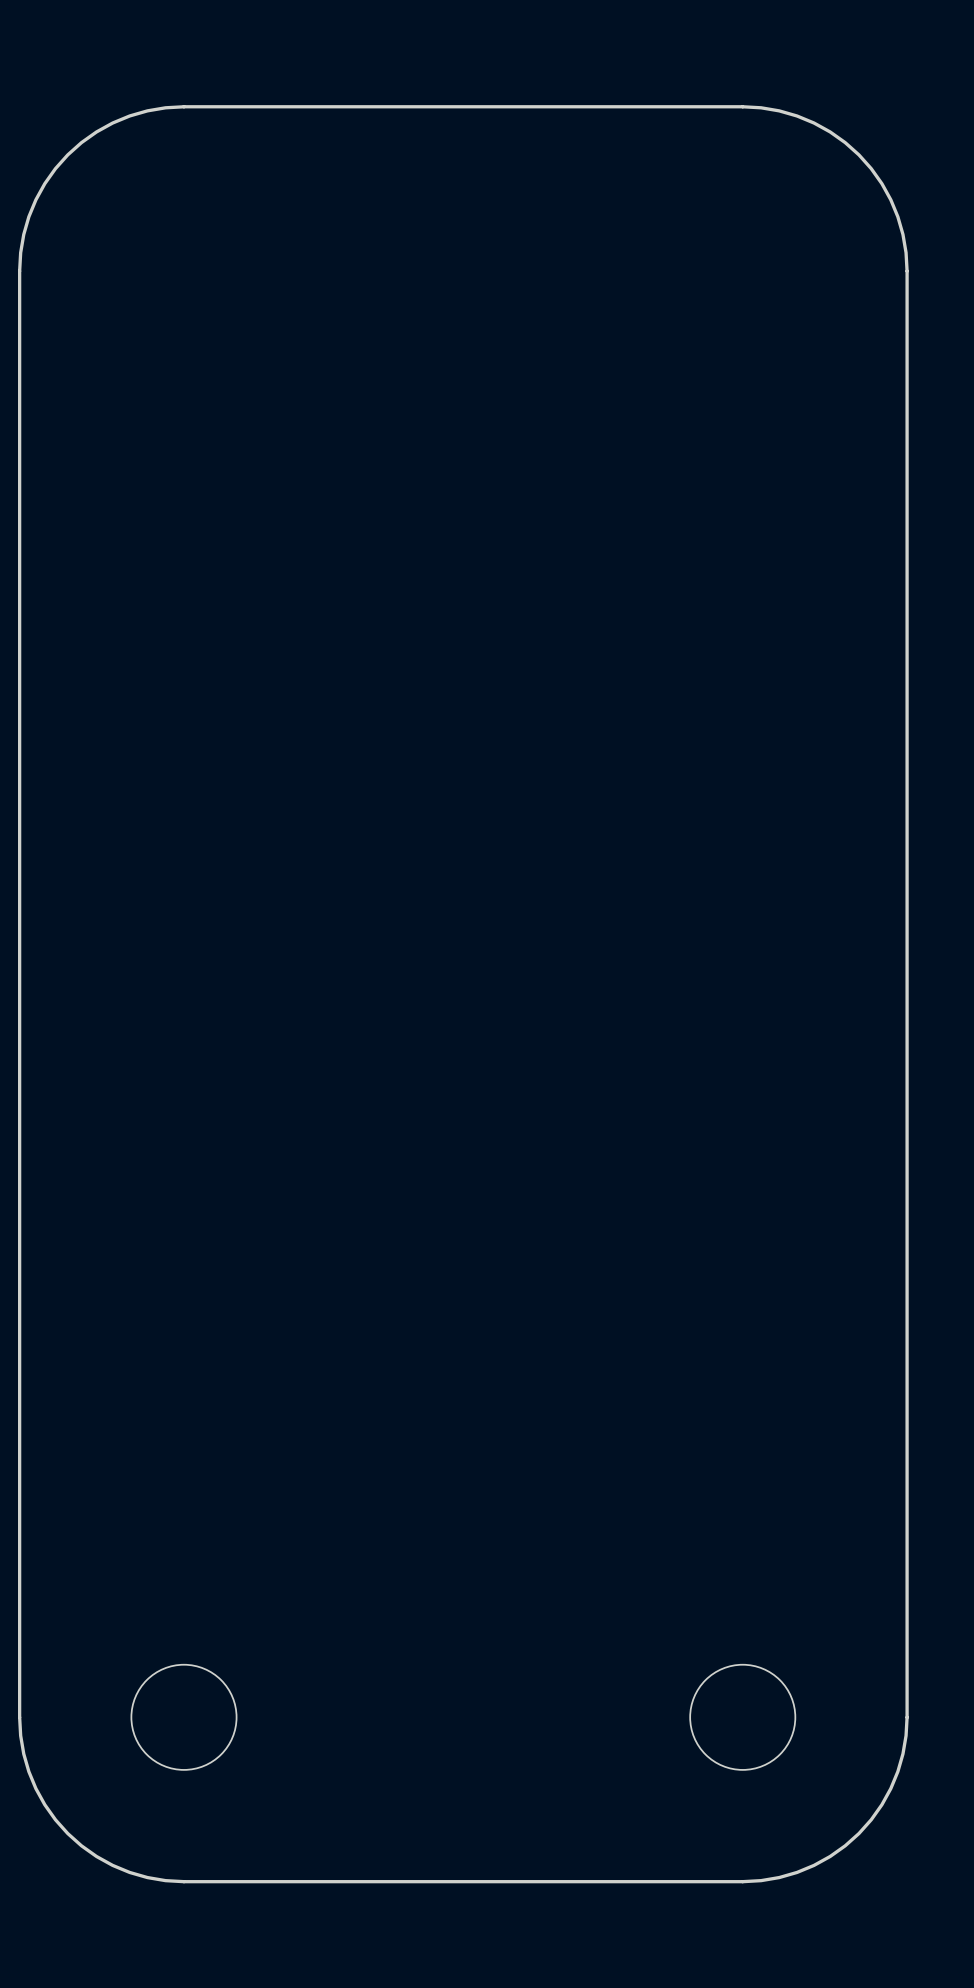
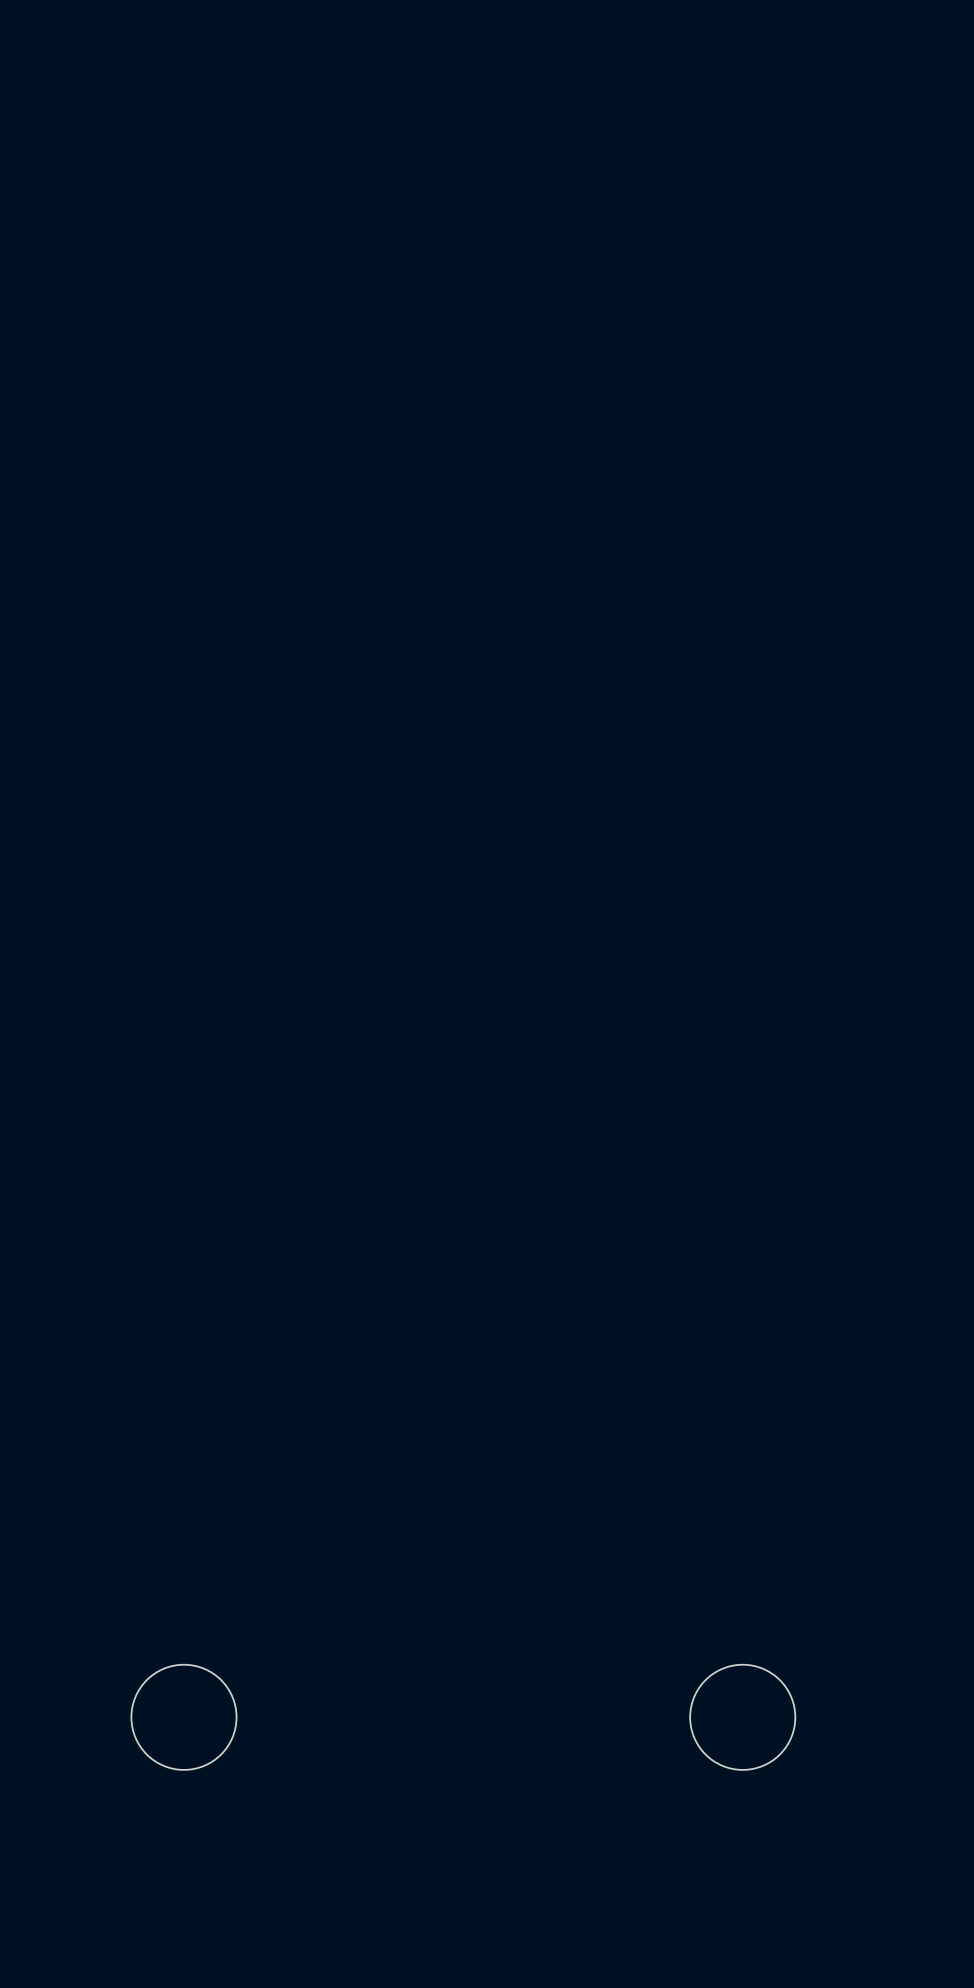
board edge: (742, 106) (165, 107) (129, 115) (112, 123) (81, 142) (55, 168) (35, 199) (28, 216) (20, 252) (19, 271) (20, 1735) (28, 1771) (44, 1804) (55, 1819) (81, 1845) (112, 1865) (129, 1872) (147, 1877) (183, 1881) (761, 1880) (797, 1872) (814, 1865) (845, 1845) (871, 1819) (881, 1804) (897, 1771) (906, 1735) (907, 1717) (906, 252) (902, 234) (890, 199) (871, 168) (858, 154) (845, 142) (814, 123) (779, 110) (742, 106) -> none

